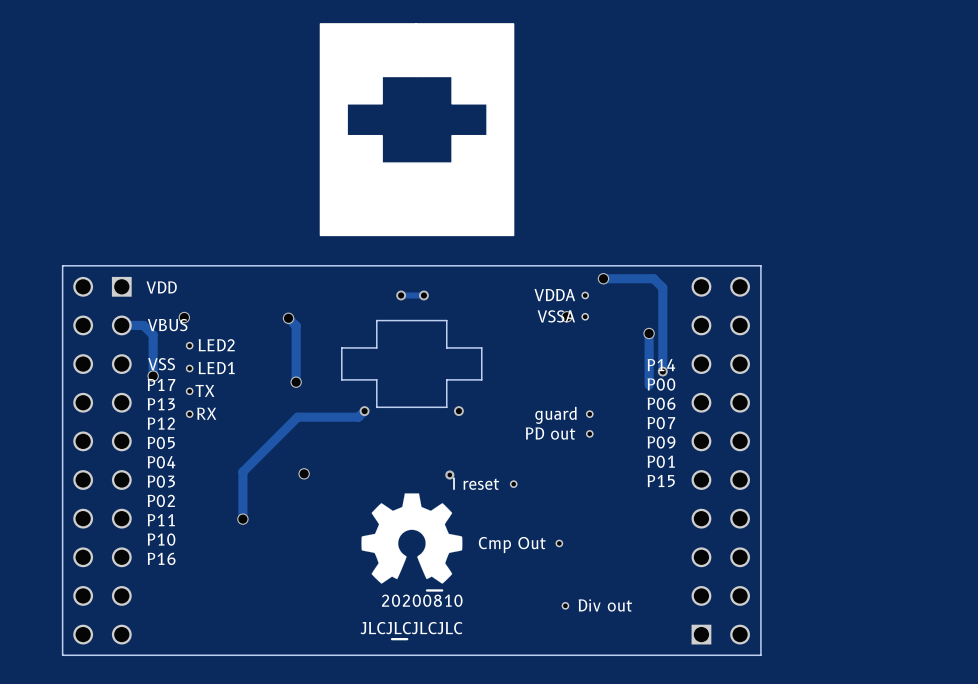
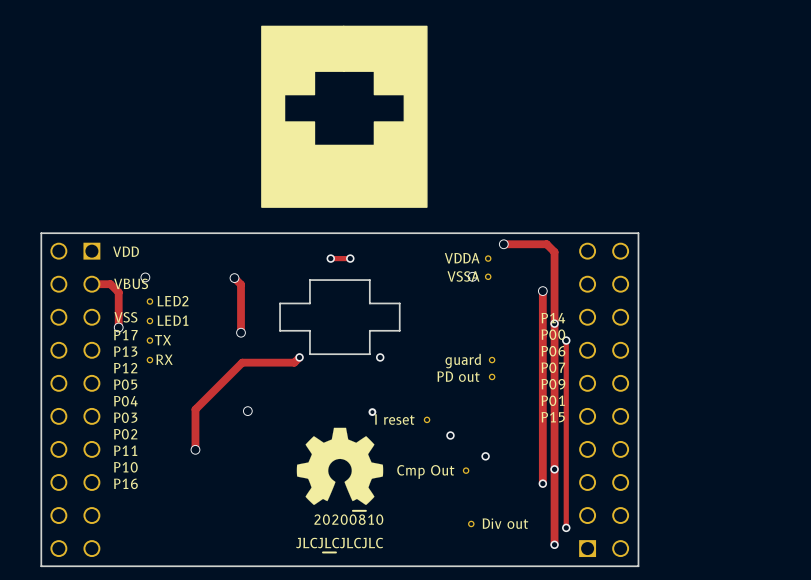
track: none -> (554, 323) (554, 544)
track: none -> (542, 335) (542, 483)
track: none -> (566, 340) (566, 527)
via: none -> (566, 340)
via: none -> (450, 435)
via: none -> (485, 456)
via: none -> (554, 469)
via: none -> (542, 483)
via: none -> (566, 527)
via: none -> (554, 544)

